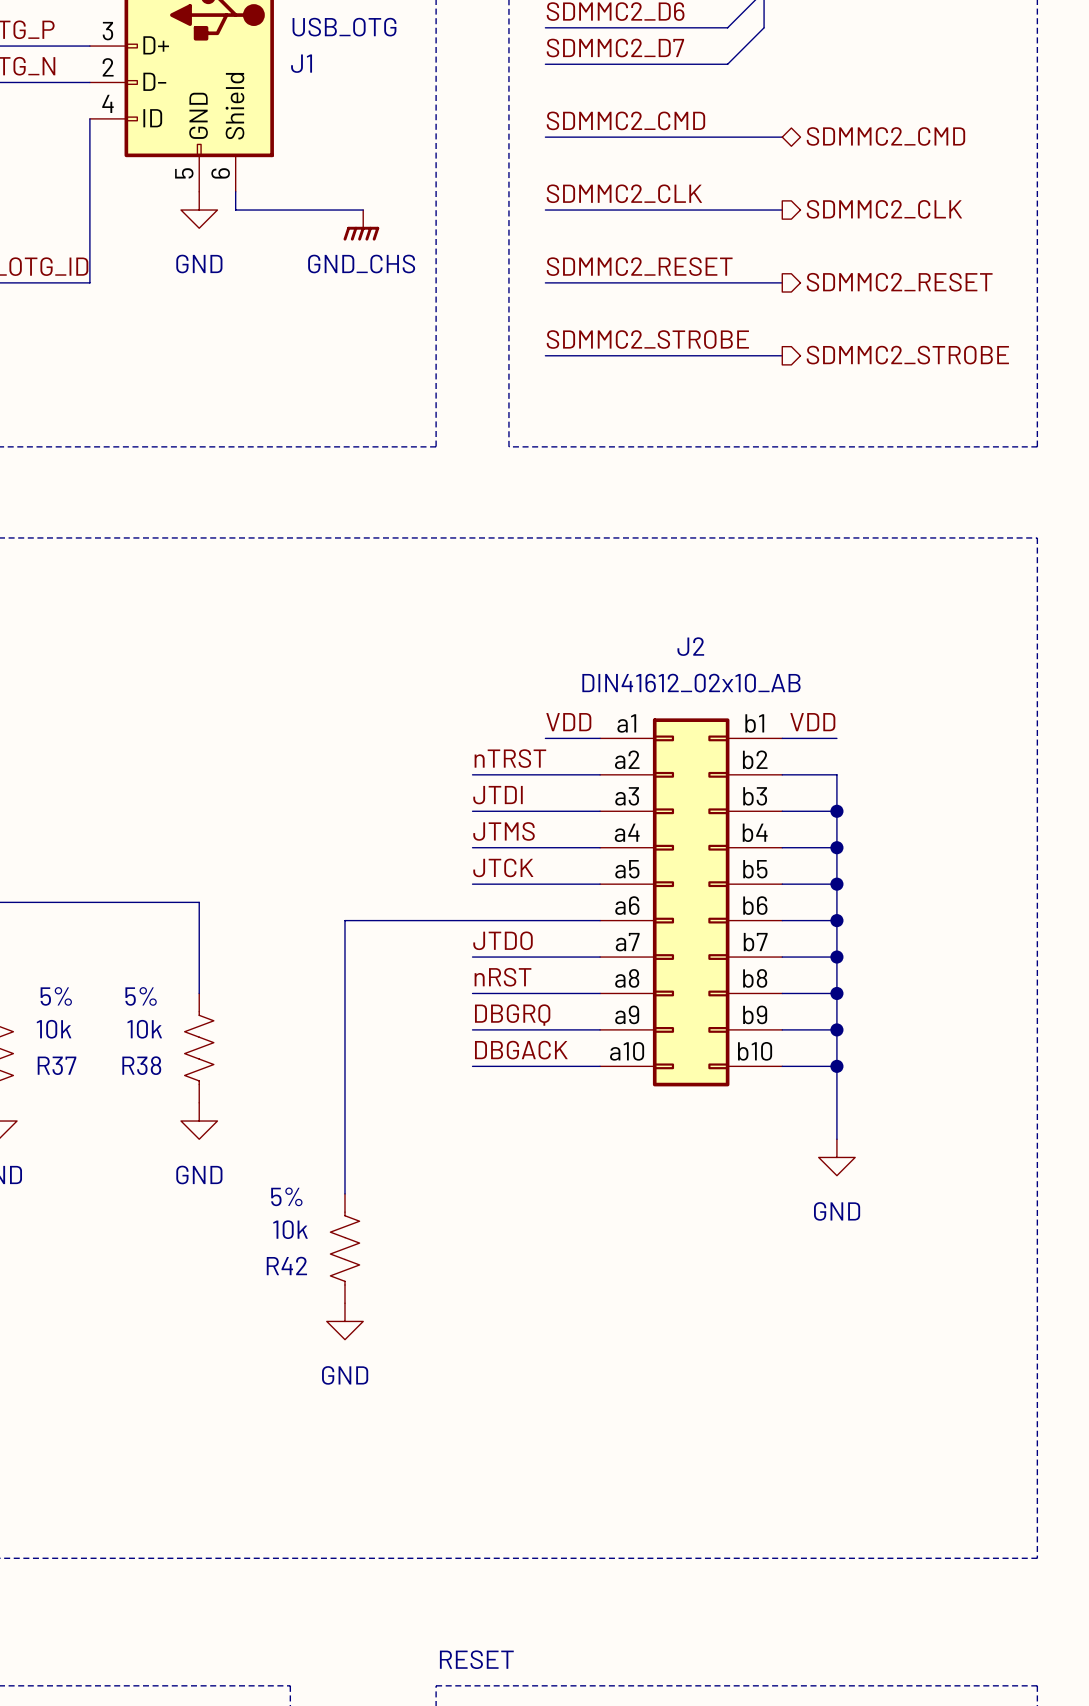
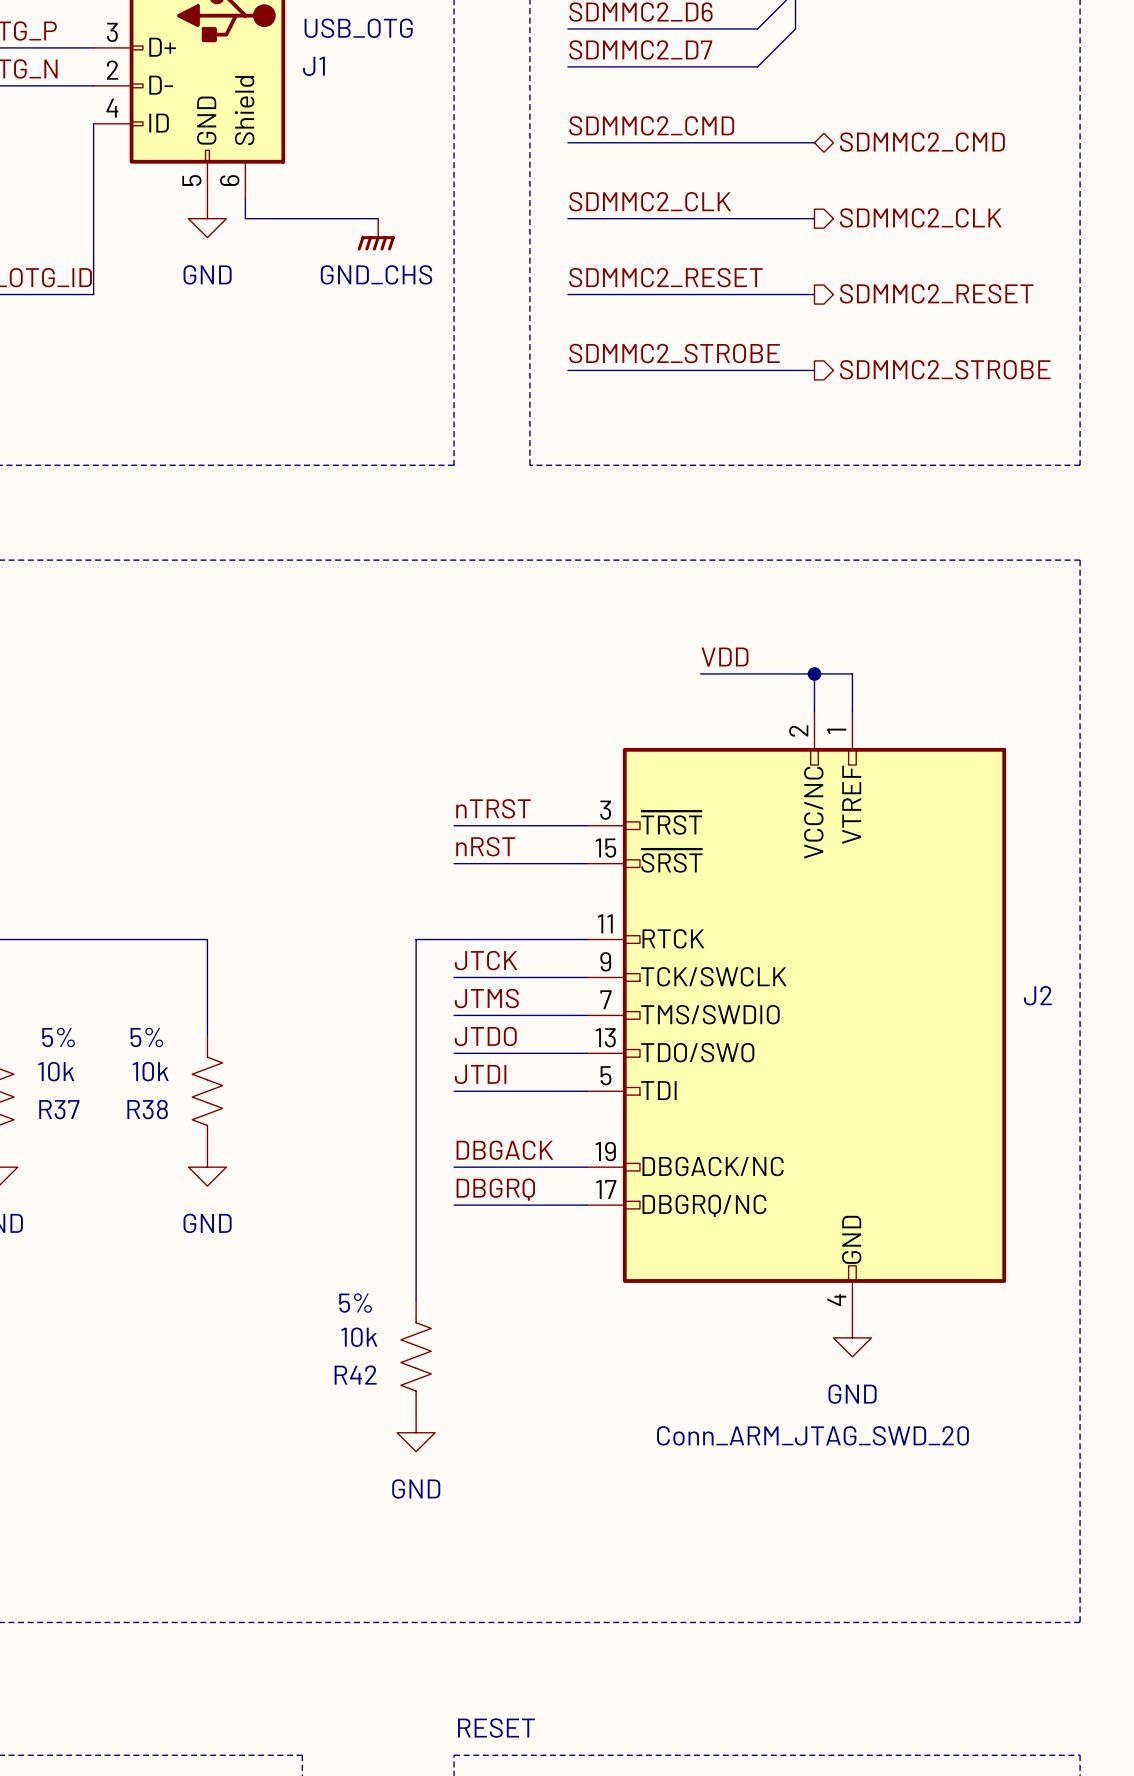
label: none -> VDD (725, 657)
J2 name position: J2 (690, 646) -> J2 (1037, 995)
wire: none -> (700, 673) (852, 673) (852, 711)
wire: none -> (814, 673) (814, 711)
junction: none -> (814, 673)
J2 value: DIN41612_02x10_AB (691, 683) -> Conn_ARM_JTAG_SWD_20 (812, 1435)
J2 symbol: [600, 718, 783, 1087] -> [586, 711, 1007, 1319]
label: VDD (568, 722) -> none
label: VDD (812, 722) -> none
wire: (545, 738) (600, 738) -> none
label position: nTRST (510, 758) -> nTRST (493, 808)
wire: (472, 774) (600, 774) -> none
label position: JTDI (498, 795) -> JTDI (480, 1074)
wire: (472, 811) (600, 811) -> (454, 825) (586, 825)
junction: (836, 811) -> none
label position: JTMS (504, 831) -> JTMS (486, 998)
wire: (472, 847) (600, 847) -> (454, 863) (586, 863)
junction: (836, 847) -> none
label position: JTCK (503, 867) -> JTCK (486, 960)
wire: (472, 884) (600, 884) -> (454, 1167) (586, 1167)
junction: (836, 884) -> none
wire: none -> (586, 939) (416, 939) (416, 1299)
wire: (600, 920) (344, 920) (344, 1193) -> none
junction: (836, 920) -> none
label position: JTDO (503, 940) -> JTDO (485, 1036)
wire: (472, 957) (600, 957) -> (454, 977) (586, 977)
junction: (836, 957) -> none
label position: nRST (503, 977) -> nRST (485, 846)
wire: (472, 993) (600, 993) -> (454, 1015) (586, 1015)
junction: (836, 993) -> none
label position: DBGRQ (512, 1015) -> DBGRQ (495, 1189)
wire: (472, 1029) (600, 1029) -> (454, 1053) (586, 1053)
junction: (836, 1029) -> none
label position: DBGACK (521, 1050) -> DBGACK (504, 1150)
wire: (472, 1066) (600, 1066) -> (454, 1091) (586, 1091)
junction: (836, 1066) -> none
wire: none -> (454, 1205) (586, 1205)
power symbol position: GND (836, 1157) -> GND (852, 1337)
R42 position: (344, 1248) -> (416, 1356)
power symbol position: GND (344, 1321) -> GND (416, 1432)

